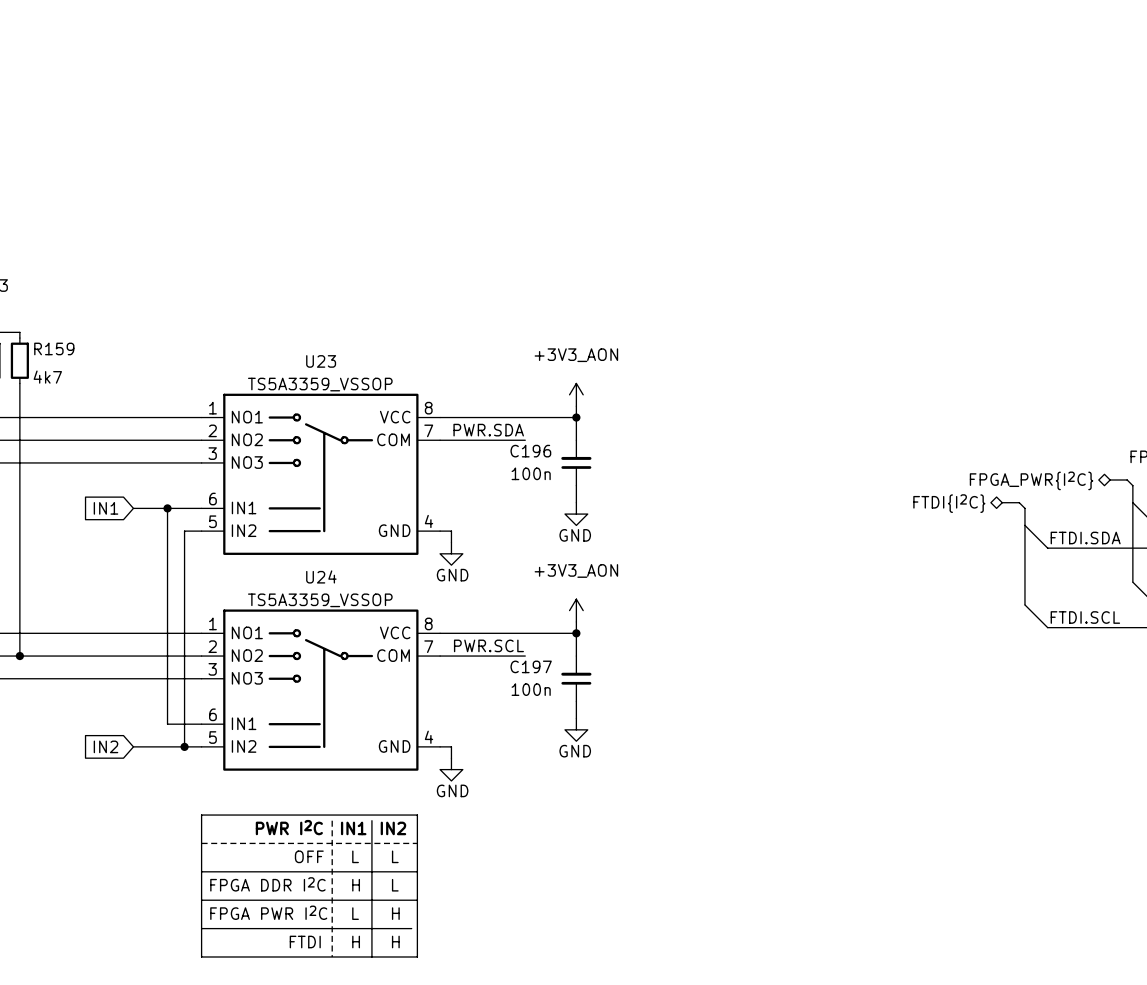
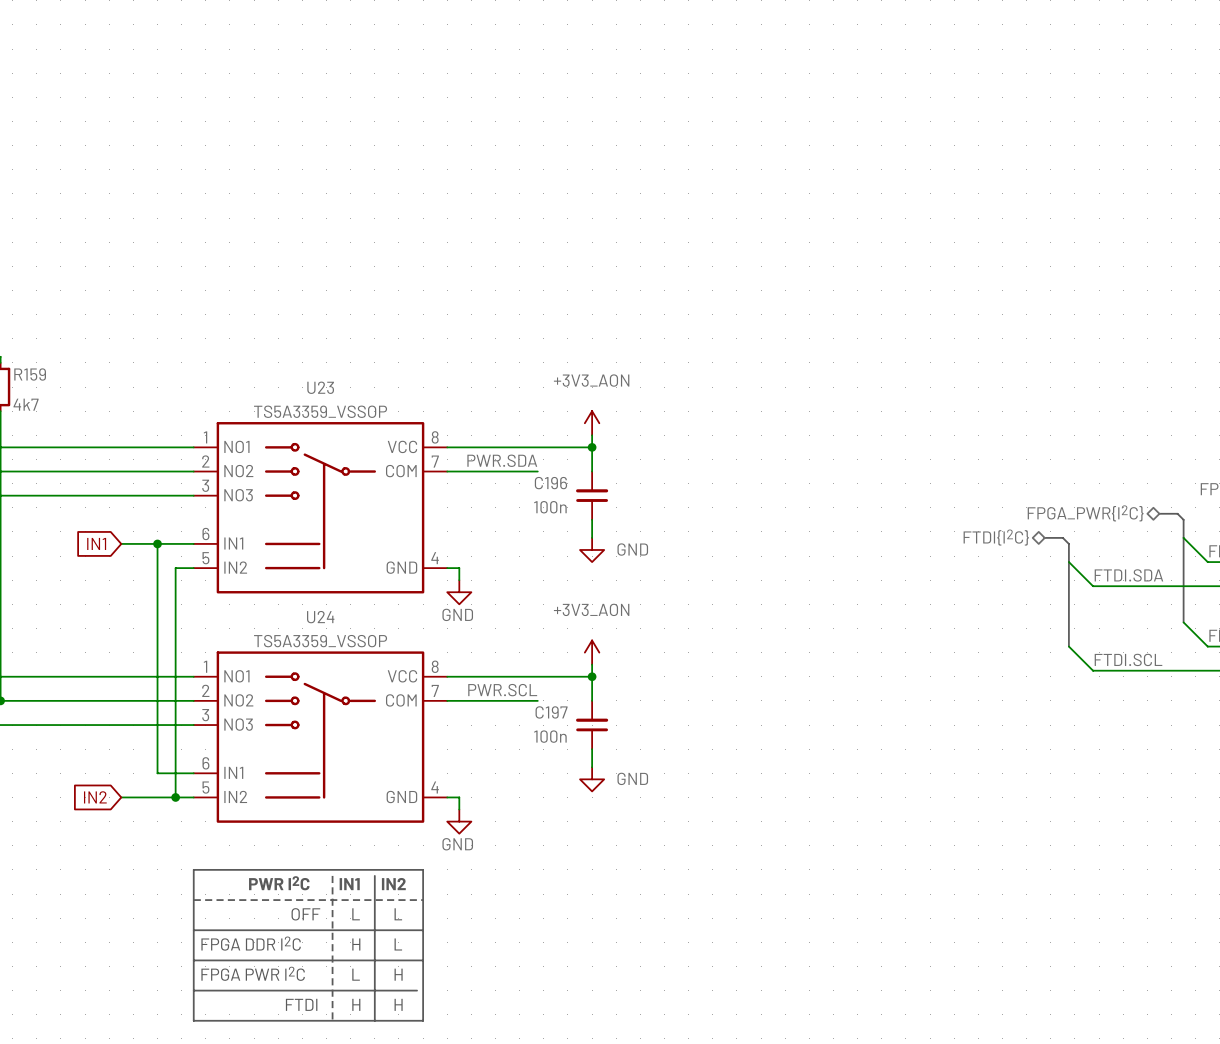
power symbol text position: GND (575, 535) -> GND (632, 549)
power symbol text position: GND (575, 751) -> GND (632, 778)

